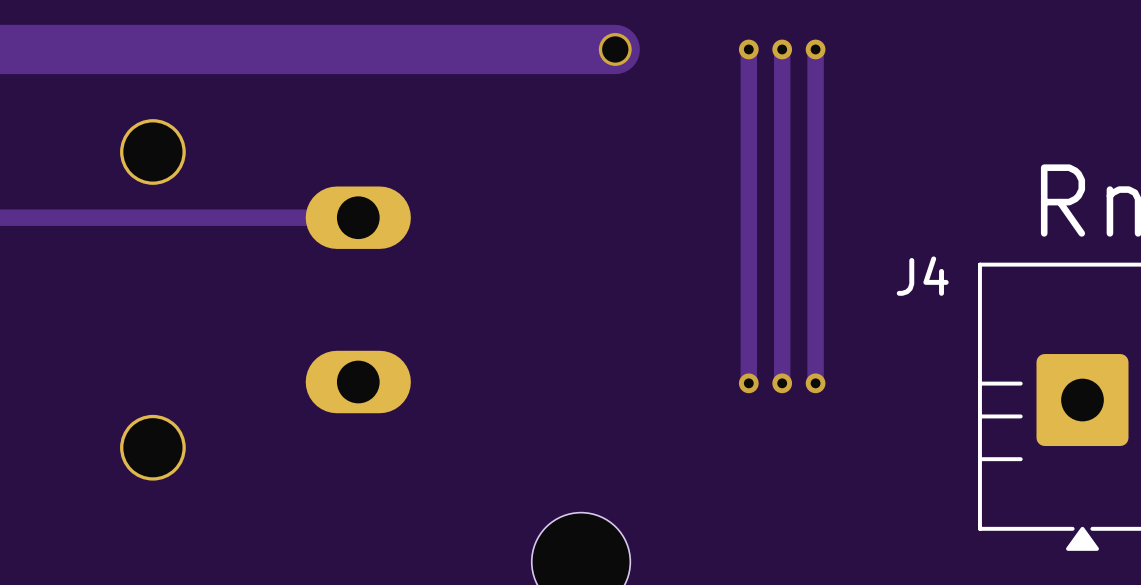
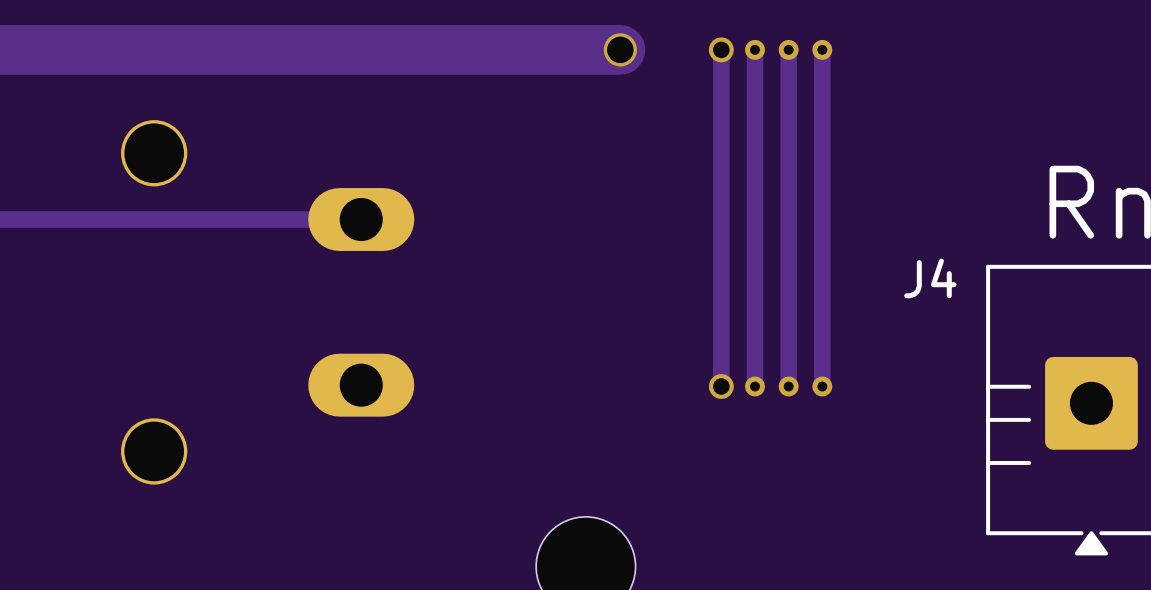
track: none -> (721, 49) (721, 386)
via: none -> (721, 49)
via: none -> (721, 386)

